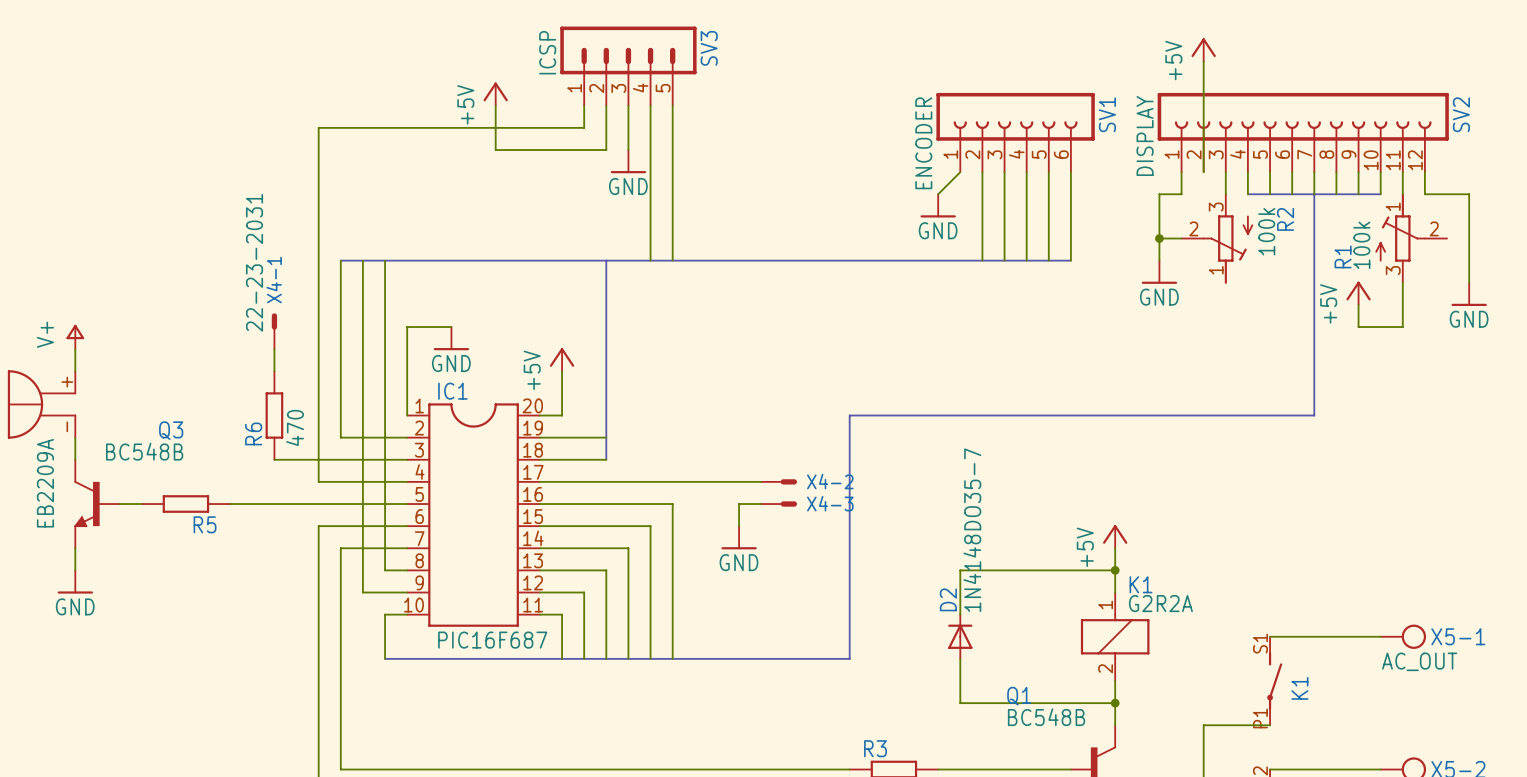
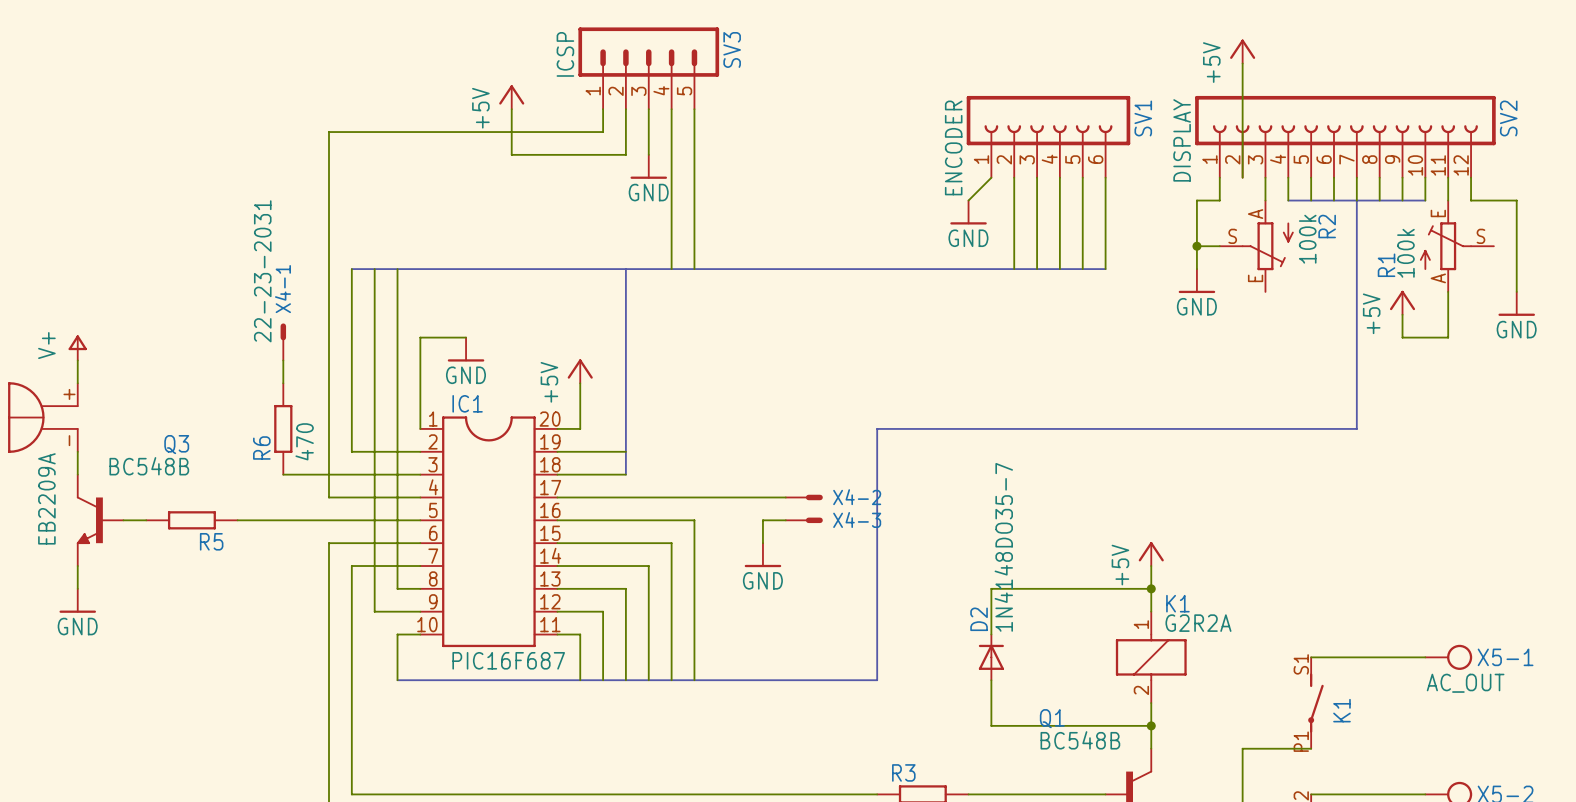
R1 symbol: [1375, 193, 1448, 283] -> [1420, 200, 1494, 292]
R2 symbol: [1181, 194, 1254, 284] -> [1219, 200, 1294, 292]

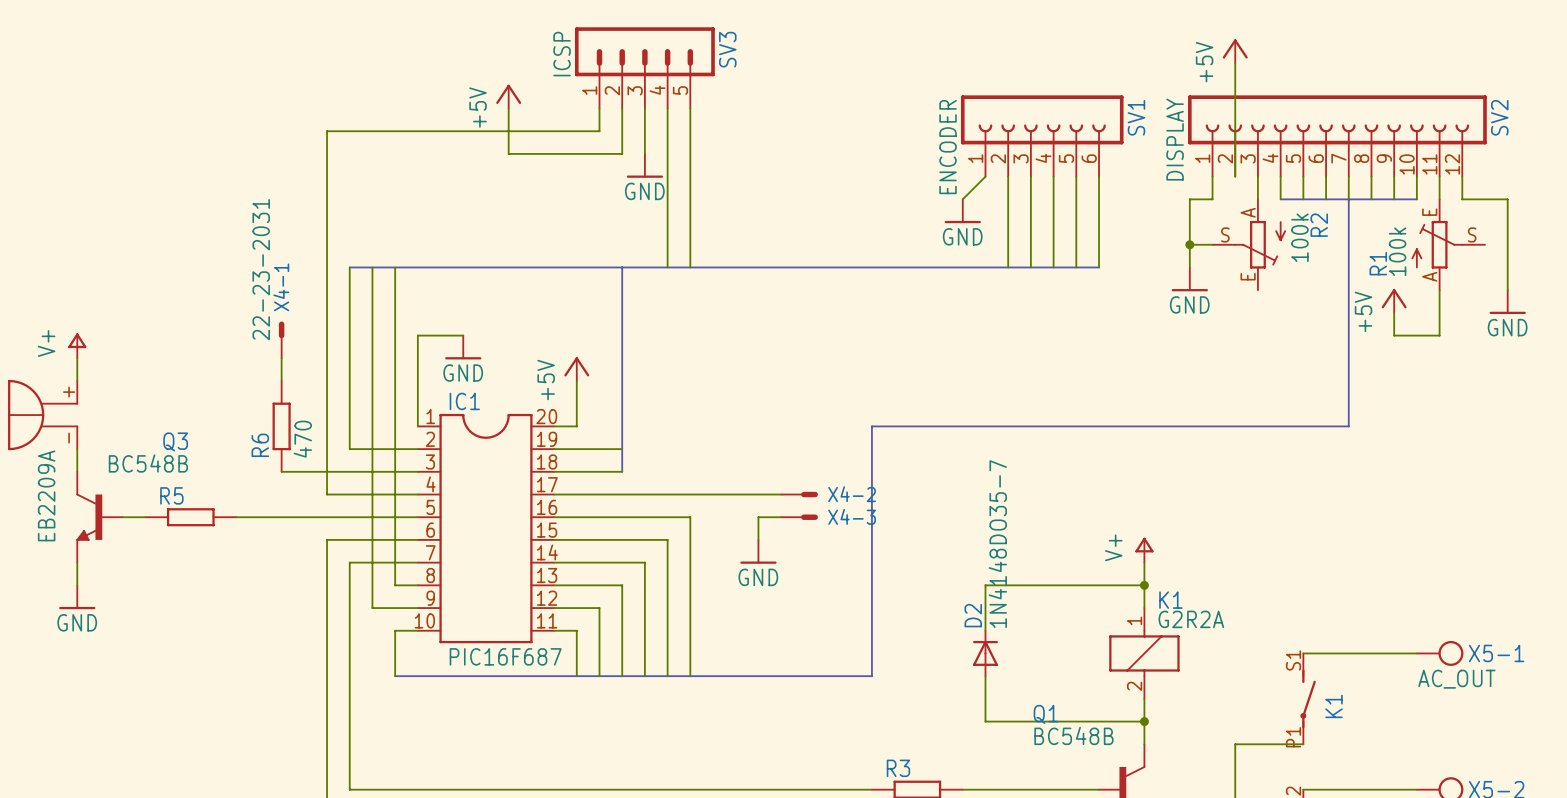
R5 name position: R5 (211, 541) -> R5 (171, 495)
power symbol: +5V (1151, 554) -> V+ (1144, 550)

